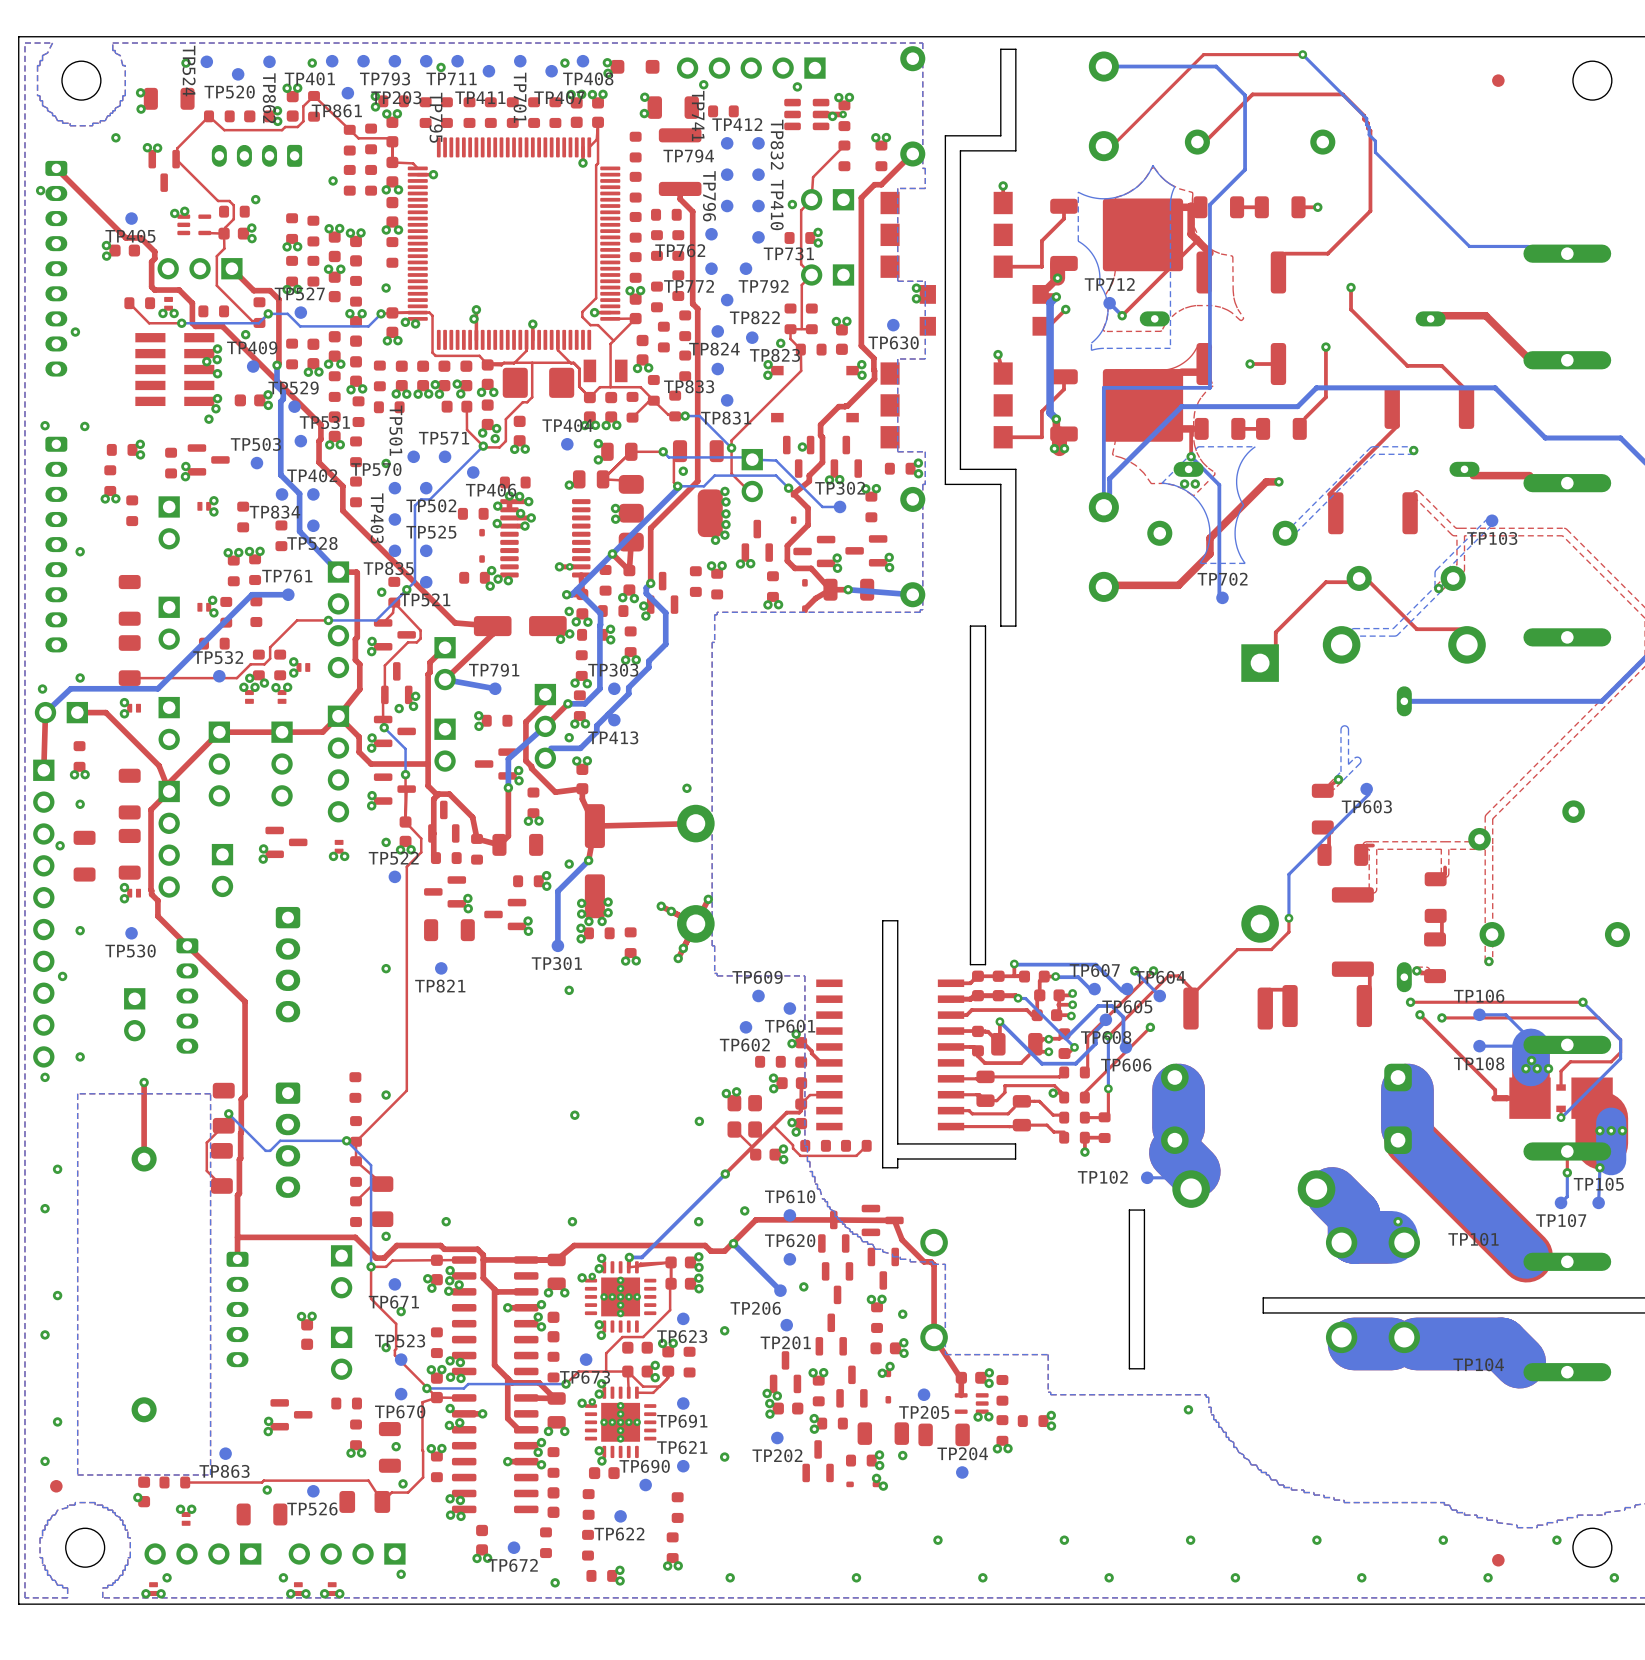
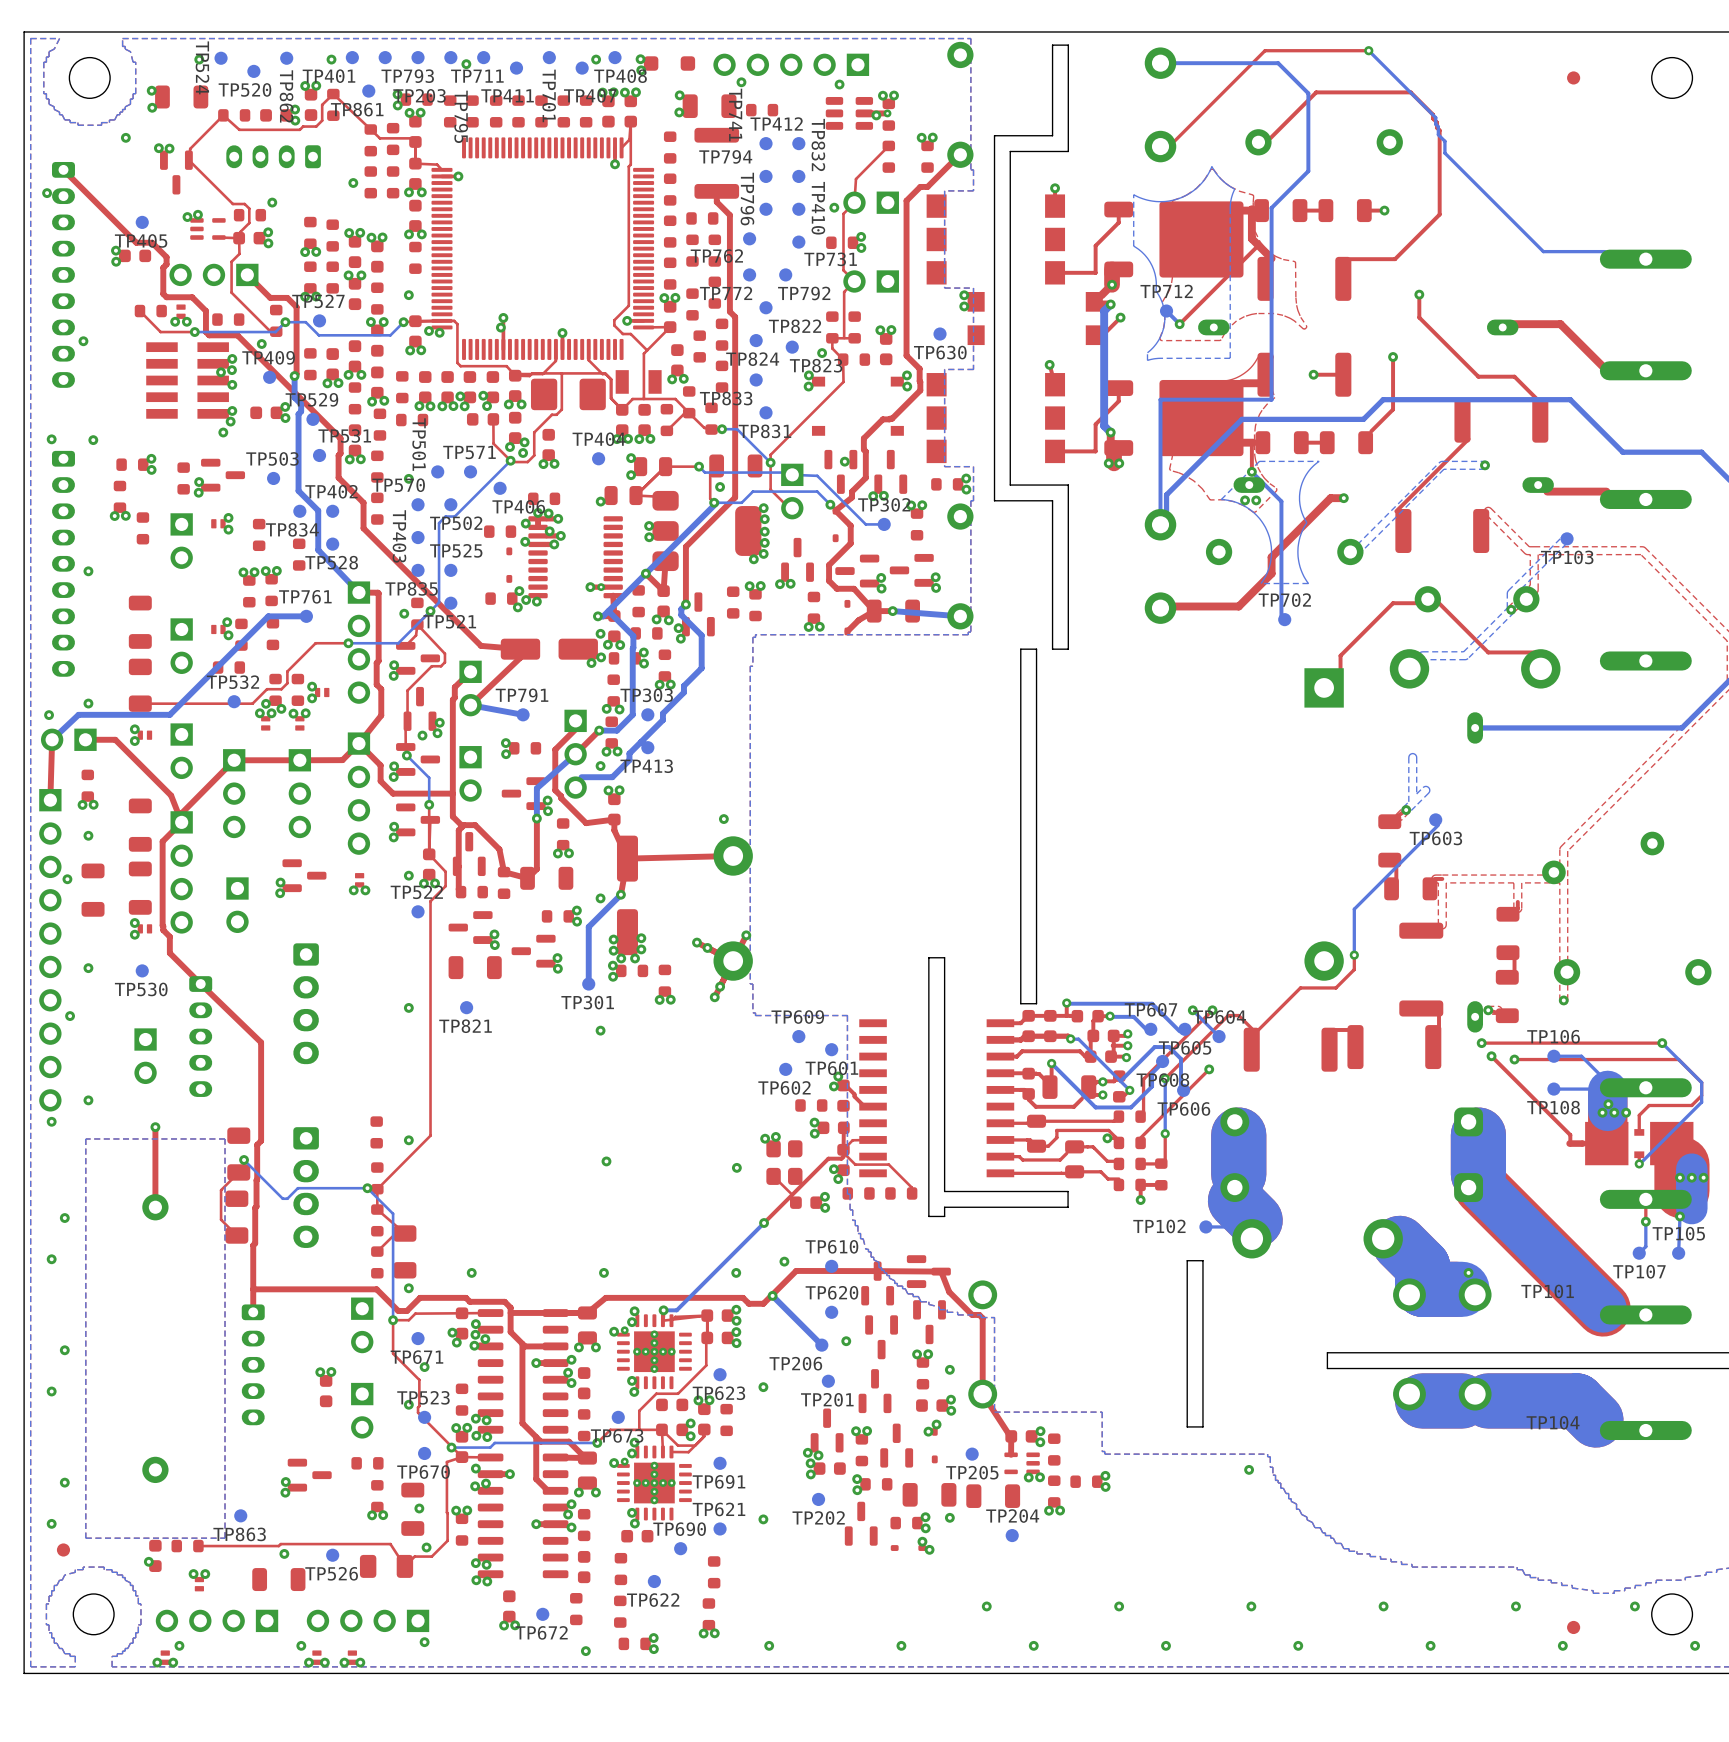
top track: (773, 1125) (793, 1145) (793, 1148) (800, 1155) (856, 1155) (866, 1145) -> (843, 1152) (855, 1164) (888, 1164) (911, 1187) (912, 1193)

